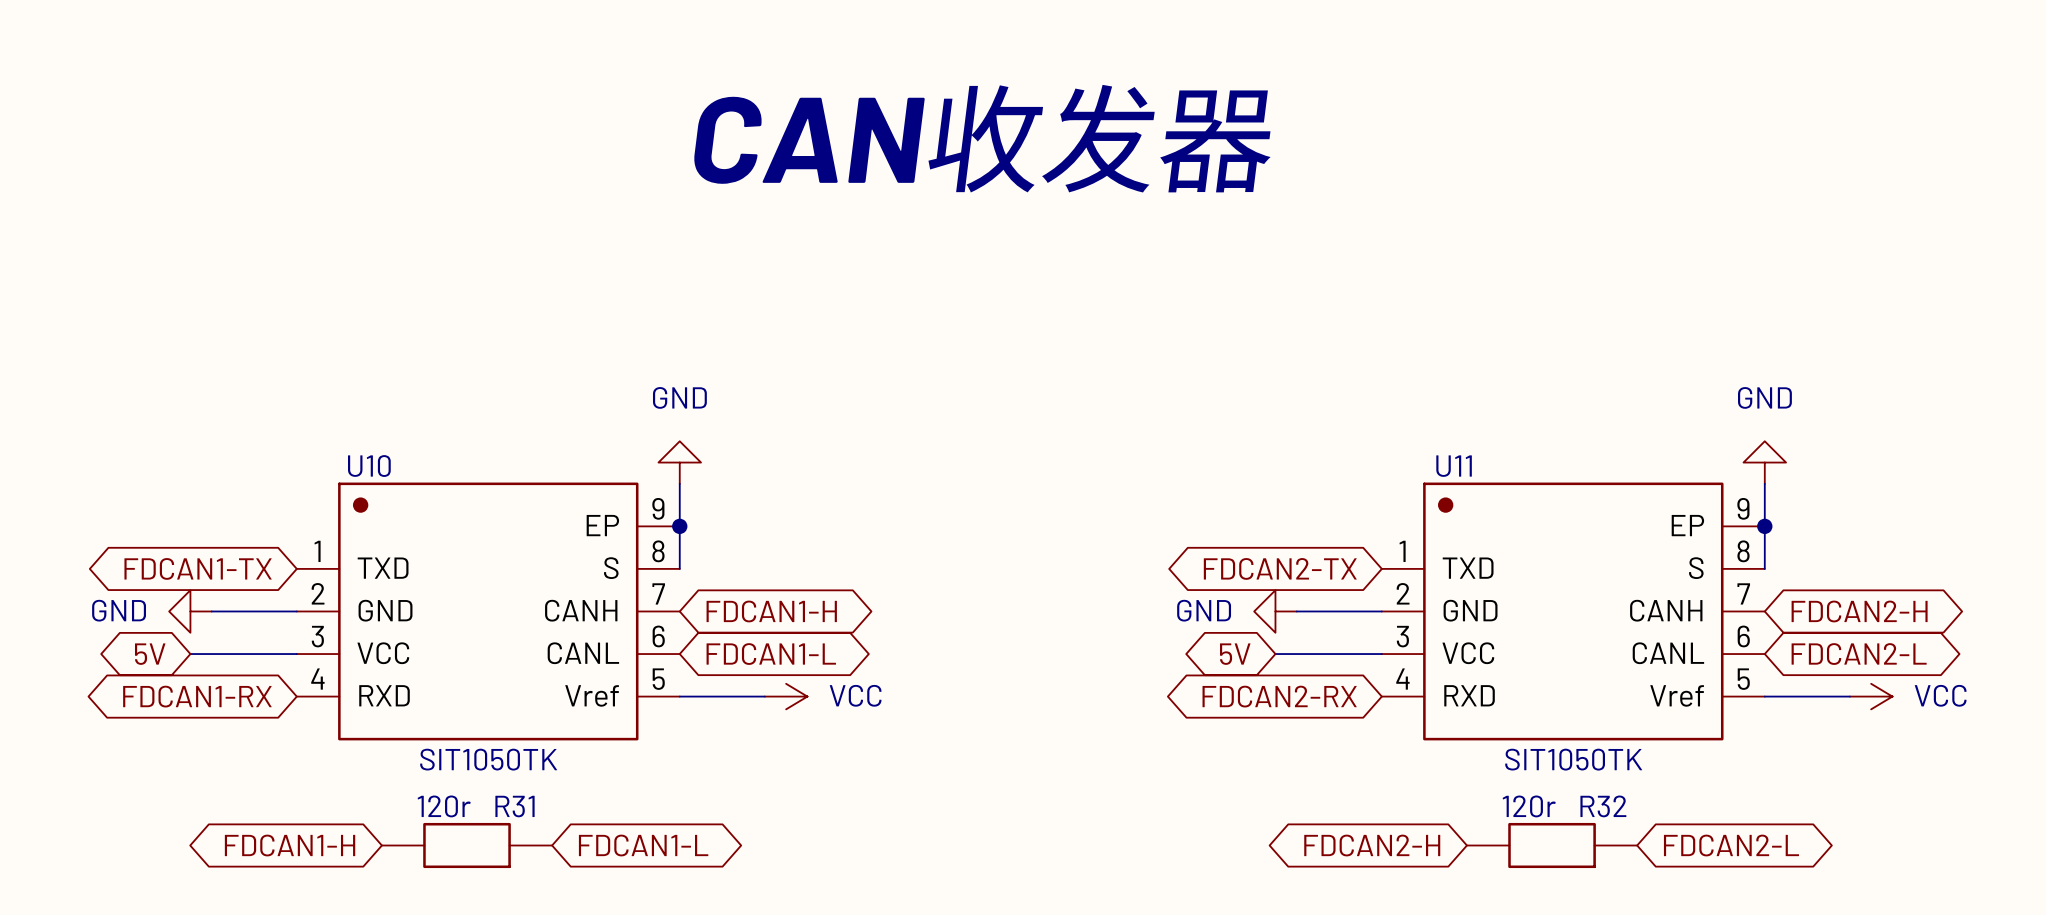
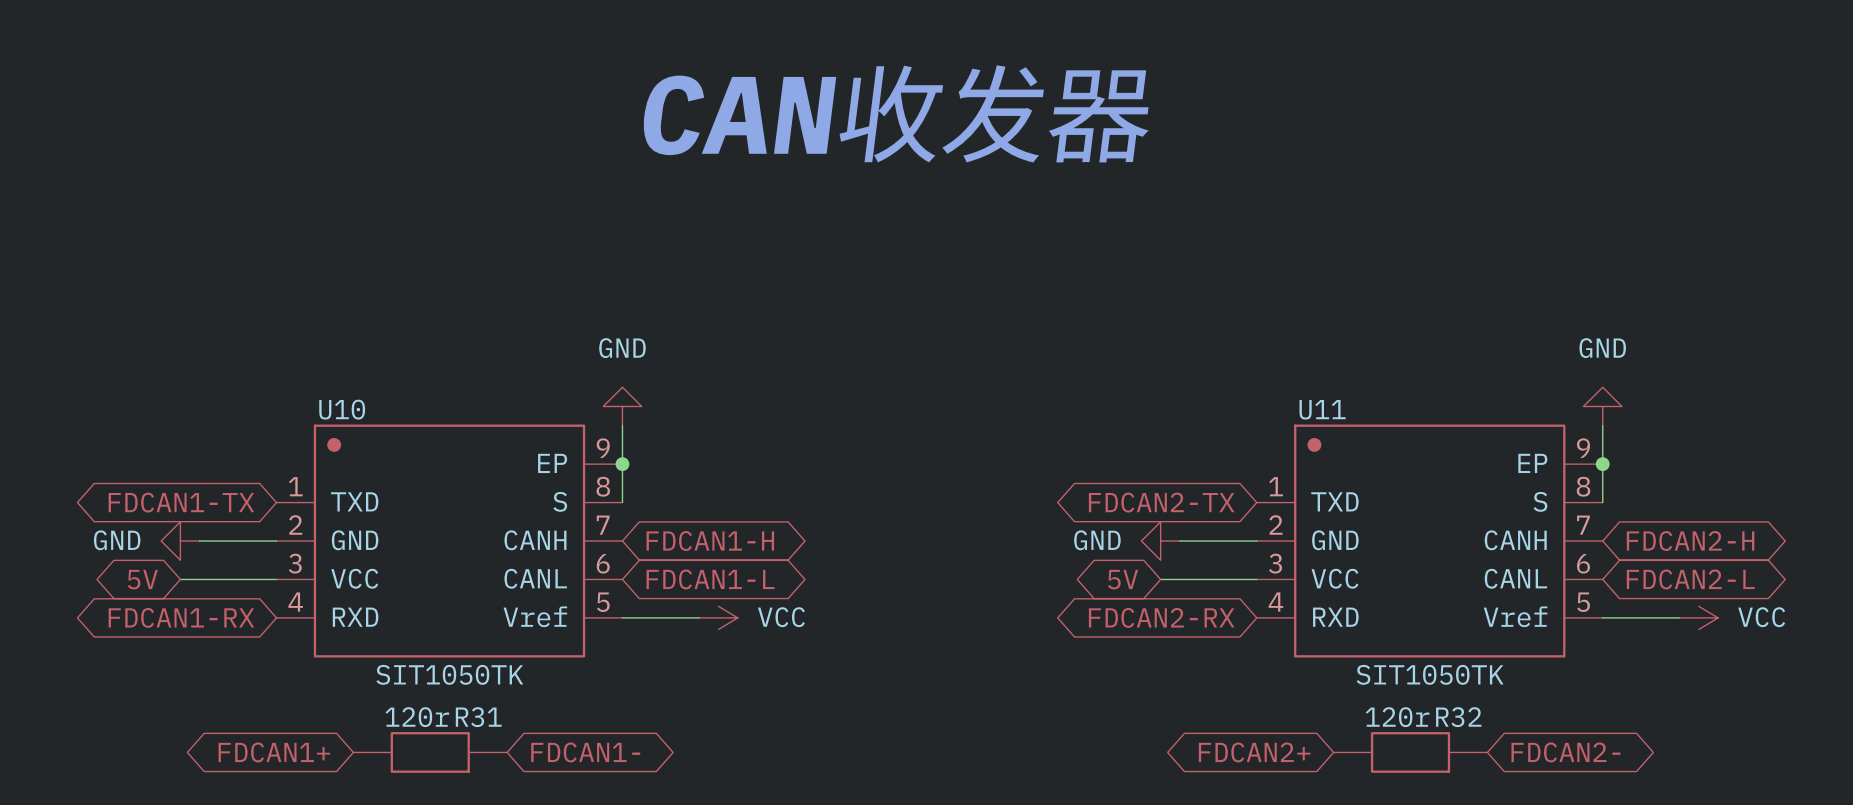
global label: FDCAN1-H (290, 845) -> FDCAN1+ (274, 752)
global label: FDCAN1-L (643, 845) -> FDCAN1- (585, 752)
global label: FDCAN2-H (1372, 845) -> FDCAN2+ (1254, 752)
global label: FDCAN2-L (1731, 845) -> FDCAN2- (1565, 752)

